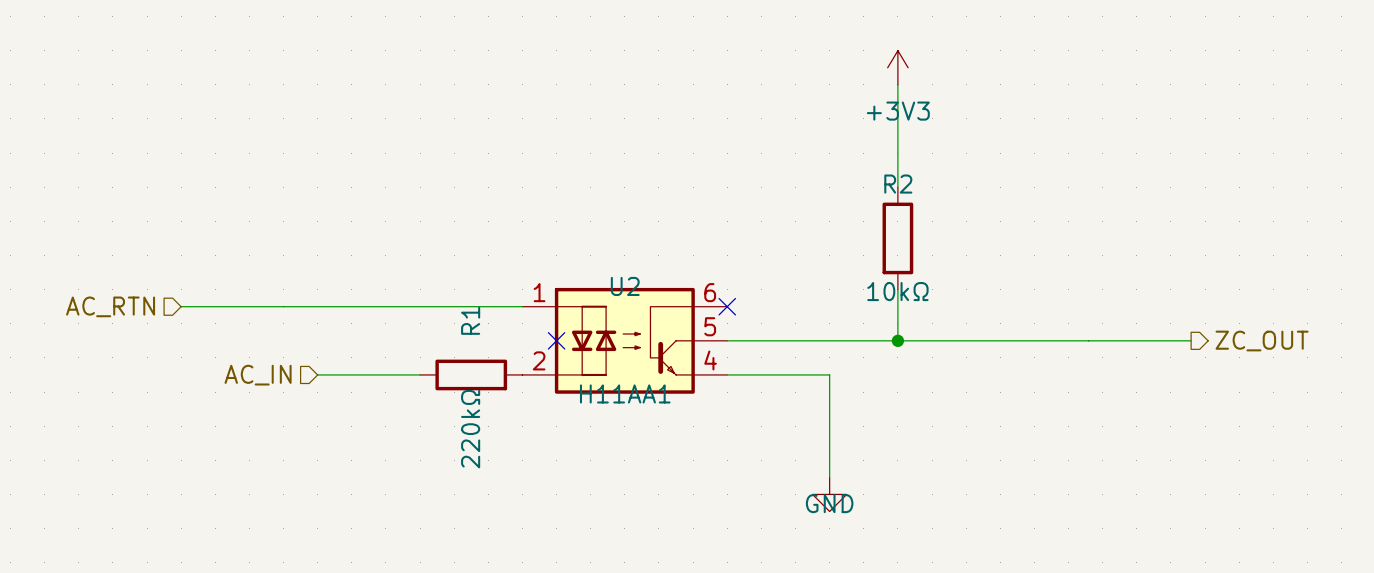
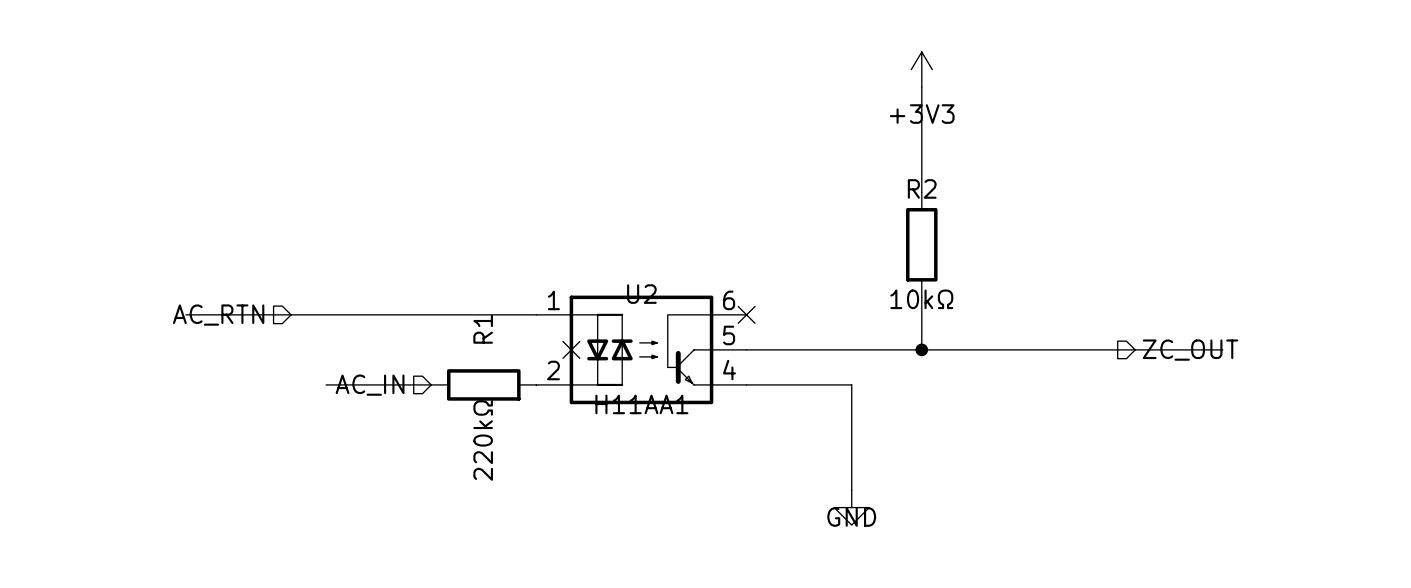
hierarchical label position: AC_RTN (110, 306) -> AC_RTN (218, 315)
hierarchical label position: ZC_OUT (1262, 341) -> ZC_OUT (1190, 350)
hierarchical label position: AC_IN (258, 375) -> AC_IN (370, 385)

